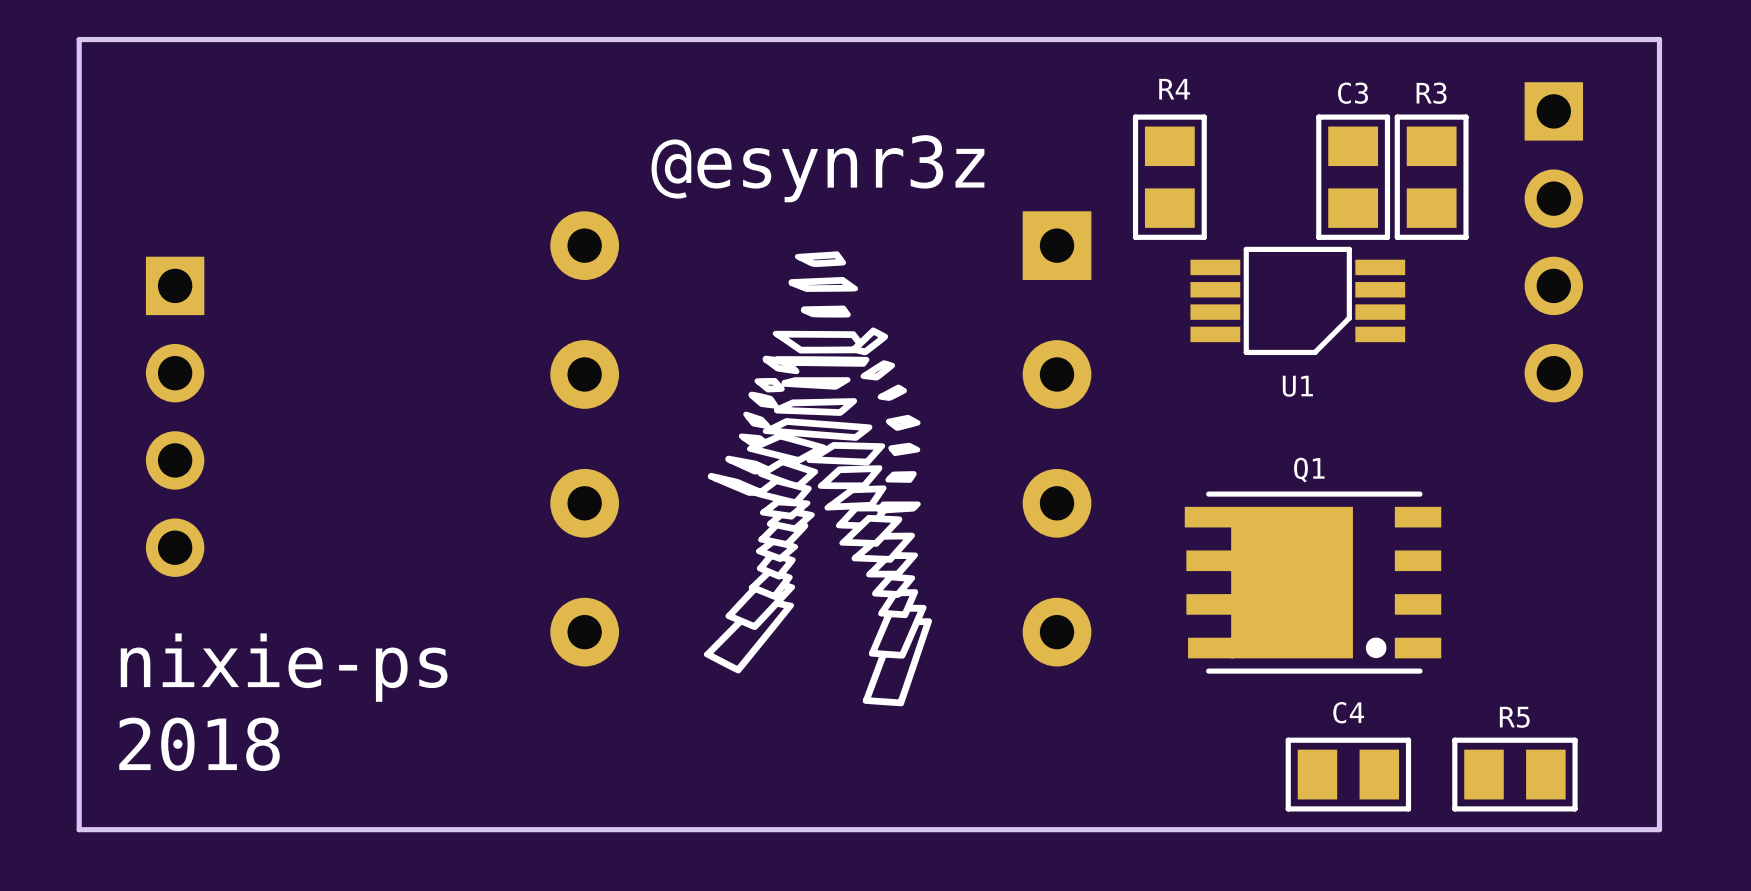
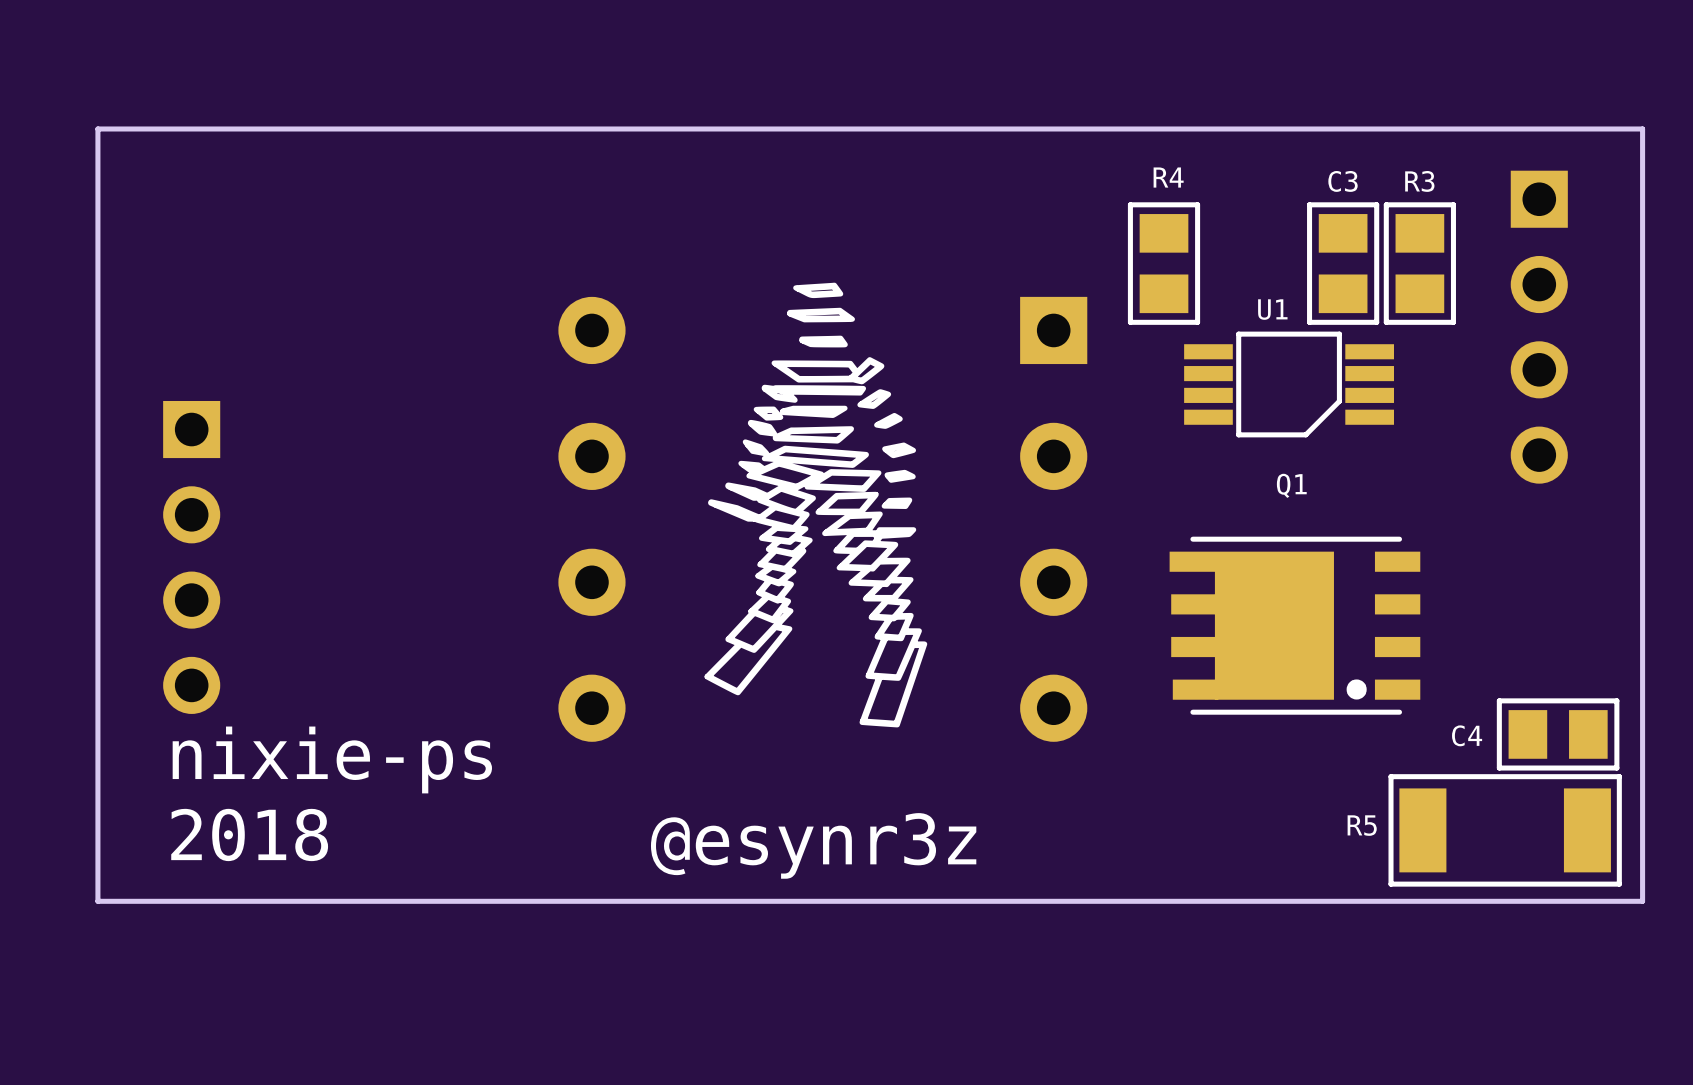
text position: @esynr3z (817, 168) -> @esynr3z (813, 845)
U1 name position: U1 (1297, 386) -> U1 (1272, 309)
part position: (175, 416) -> (191, 557)
drawing position: (818, 478) -> (815, 505)
Q1 footprint: [1184, 491, 1442, 674] -> [1169, 536, 1421, 715]
text position: nixie-ps (284, 667) -> nixie-ps (332, 759)
C4 name position: C4 (1348, 712) -> C4 (1467, 735)
R5 name position: R5 (1514, 717) -> R5 (1362, 825)
R5 footprint: [1452, 737, 1578, 812] -> [1388, 774, 1622, 887]
text position: 2018 (199, 744) -> 2018 (249, 834)
C4 position: (1348, 774) -> (1558, 734)

